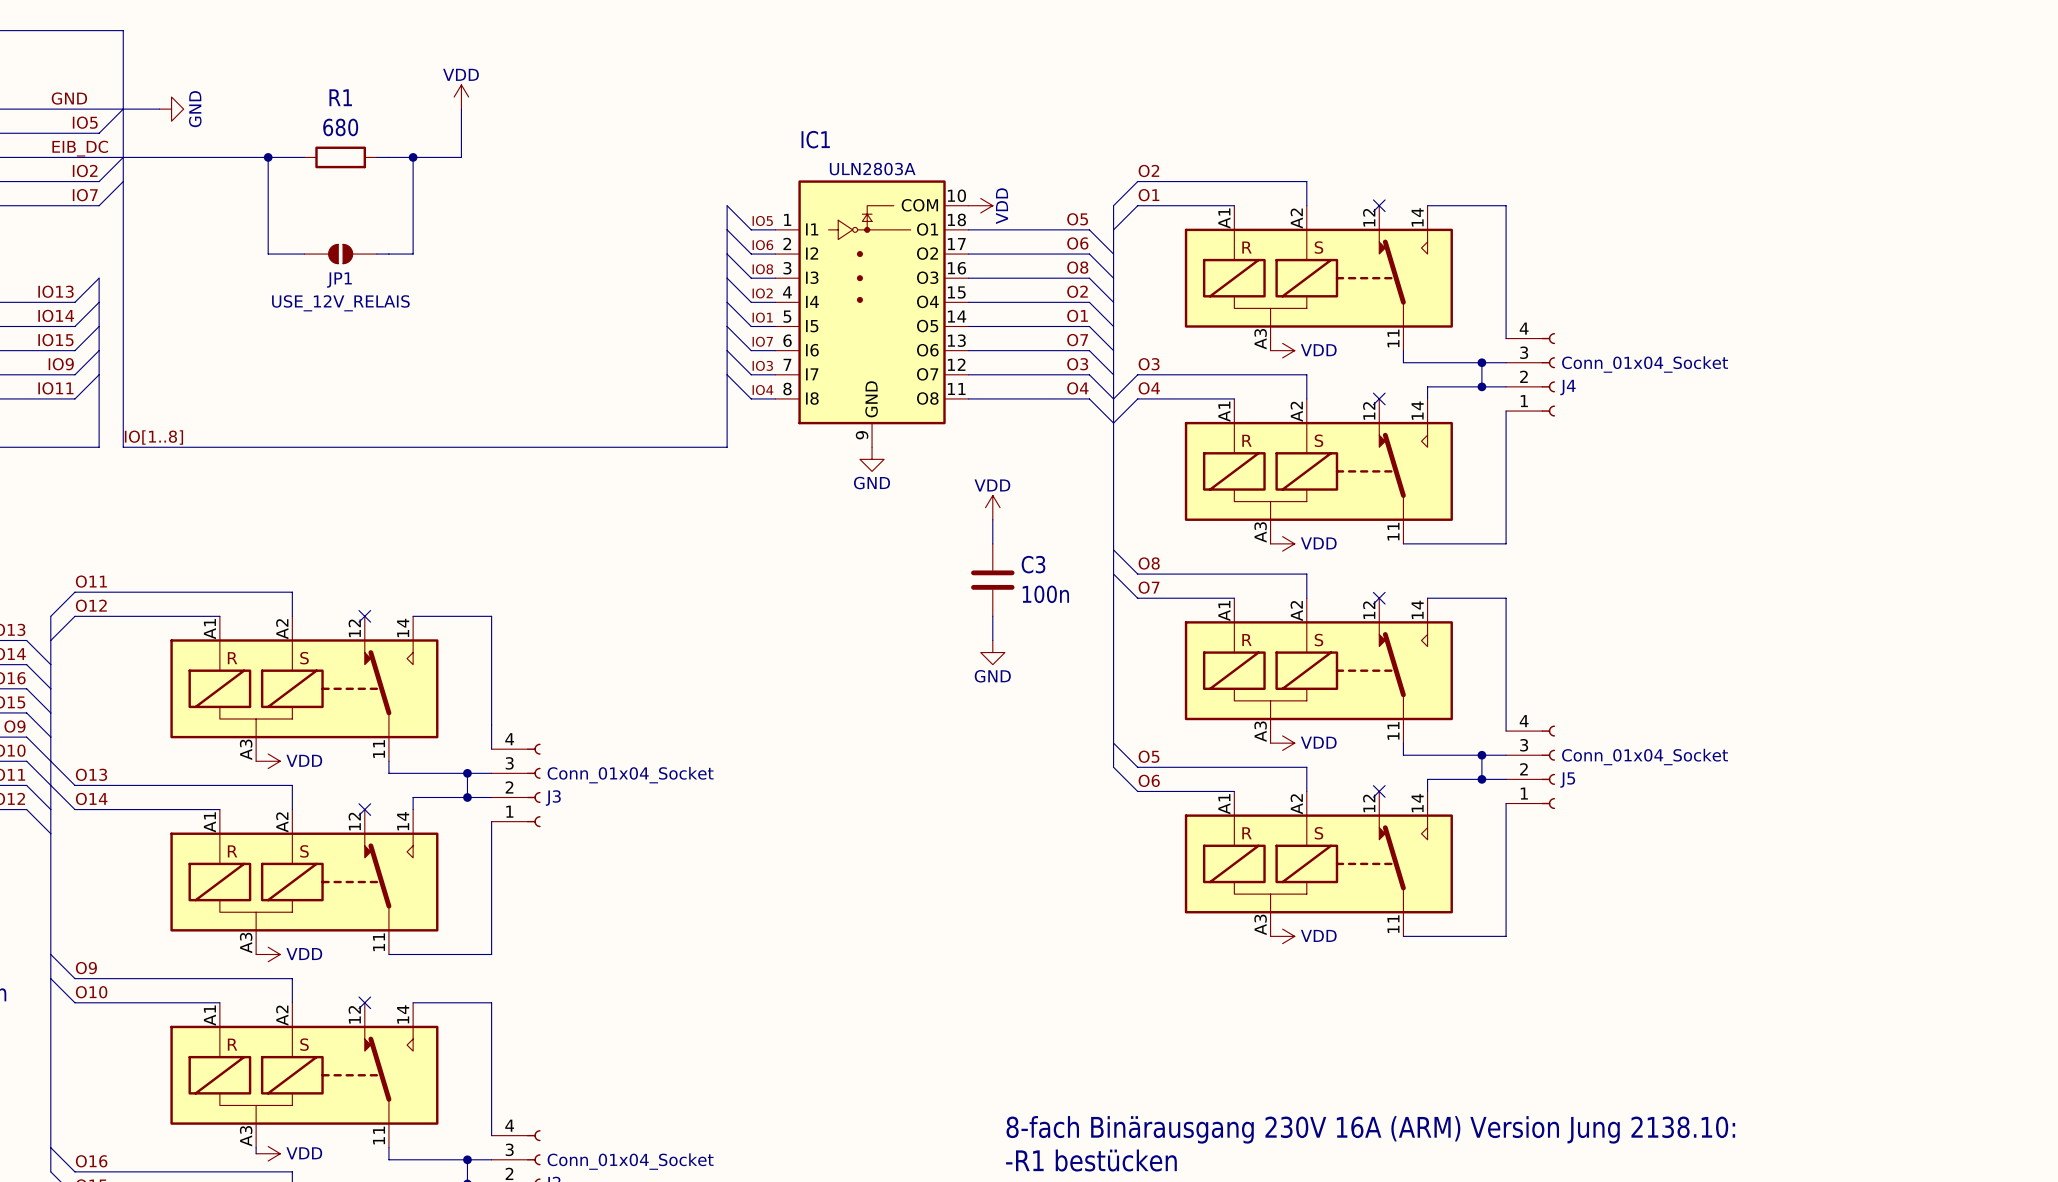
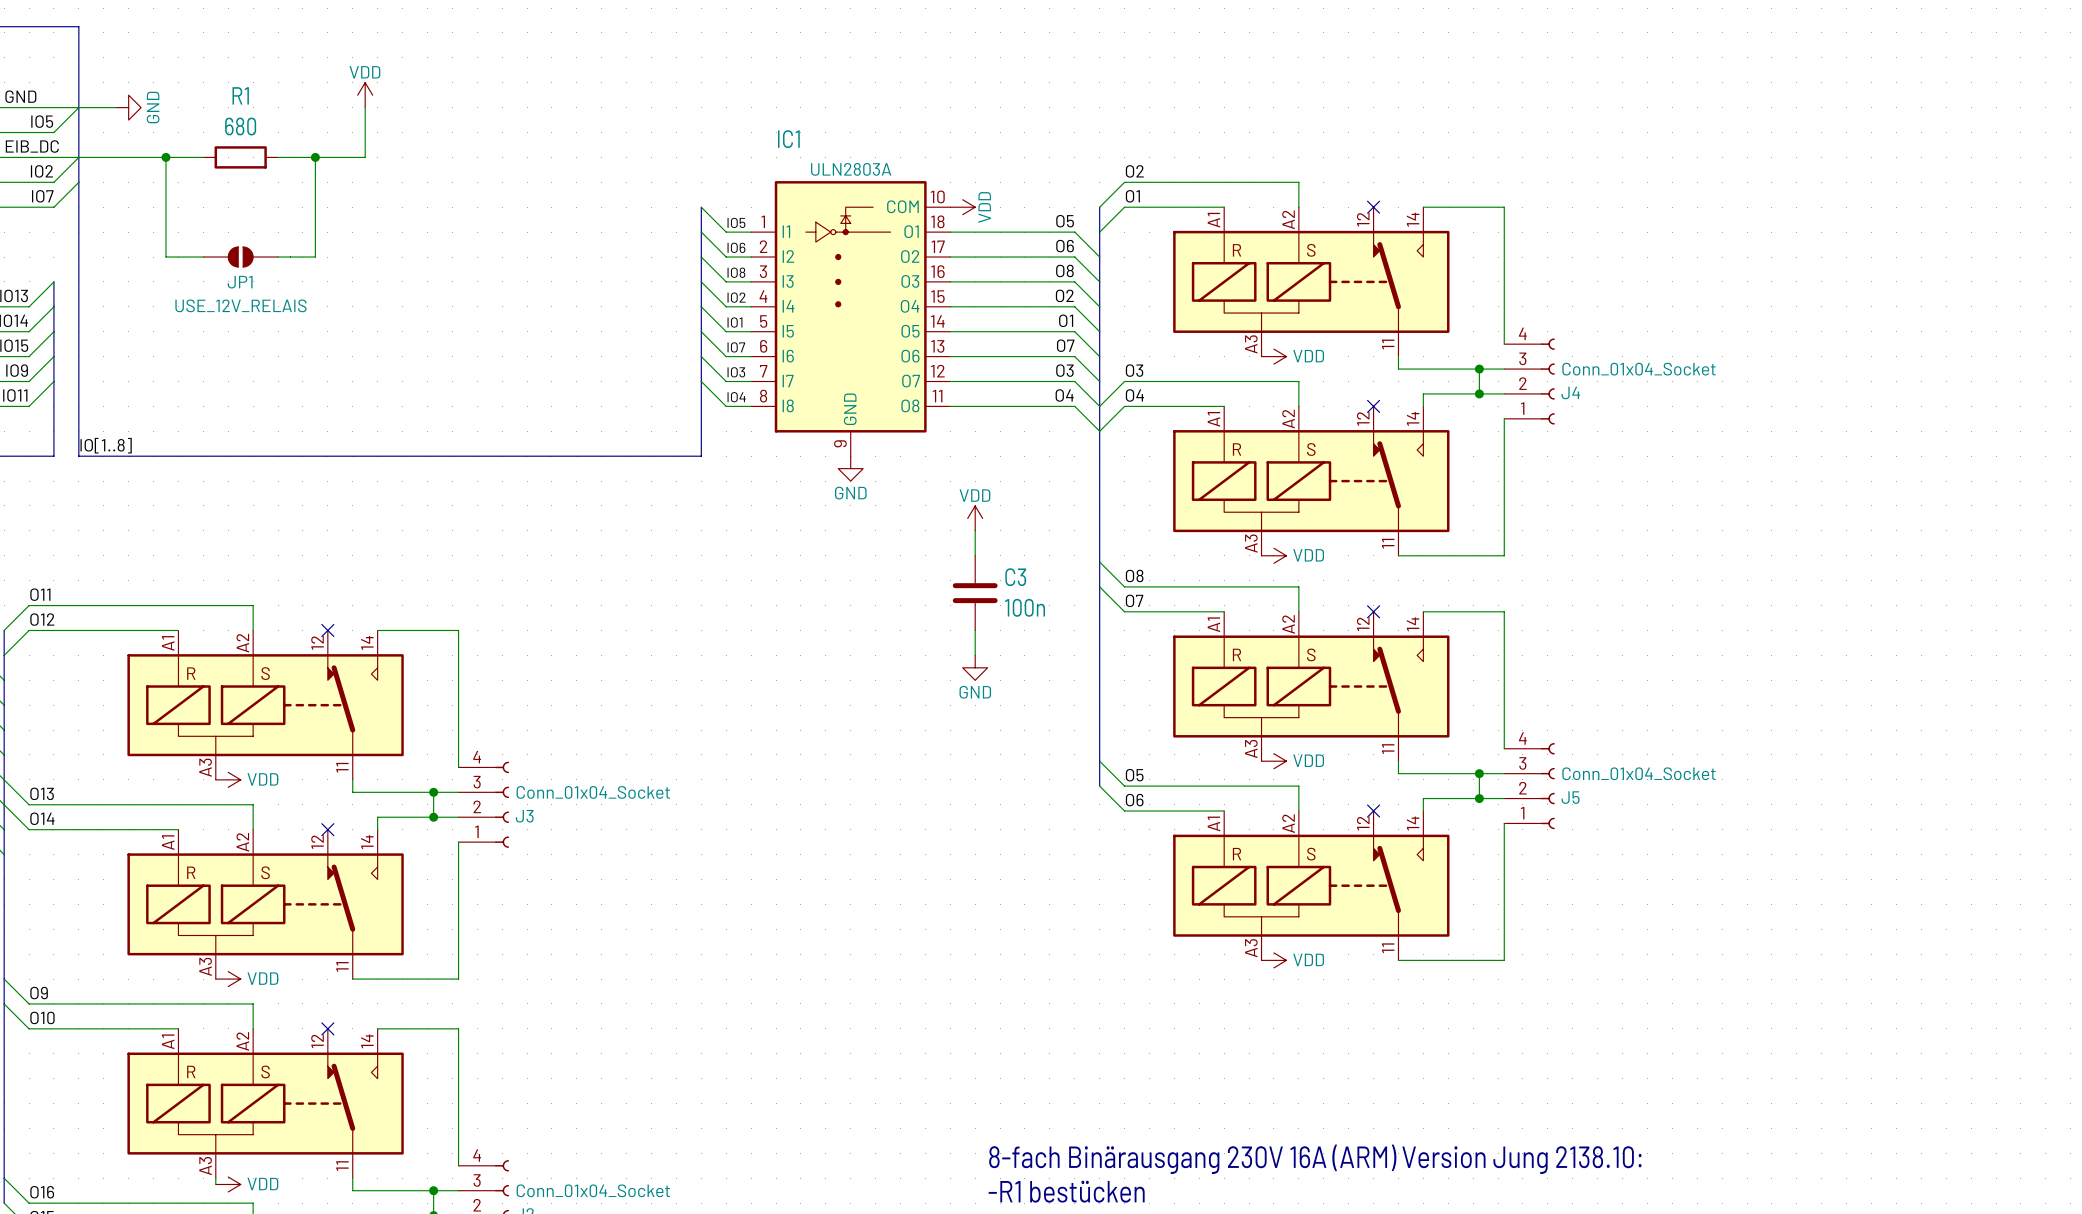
power symbol position: VDD (461, 97) -> VDD (365, 95)
wire: (461, 109) (461, 157) (401, 157) -> (365, 107) (365, 157)
junction: none -> (166, 157)
wire: (244, 157) (304, 157) -> (278, 157) (340, 157)
wire: (268, 157) (268, 254) (304, 254) -> (166, 157) (166, 257) (203, 257)
junction: (268, 157) -> none
R1 position: (340, 157) -> (240, 157)
junction: none -> (315, 157)
wire: (413, 157) (413, 254) (376, 254) -> (315, 157) (315, 257) (278, 257)
junction: (413, 157) -> none
JP1 position: (340, 254) -> (240, 257)

